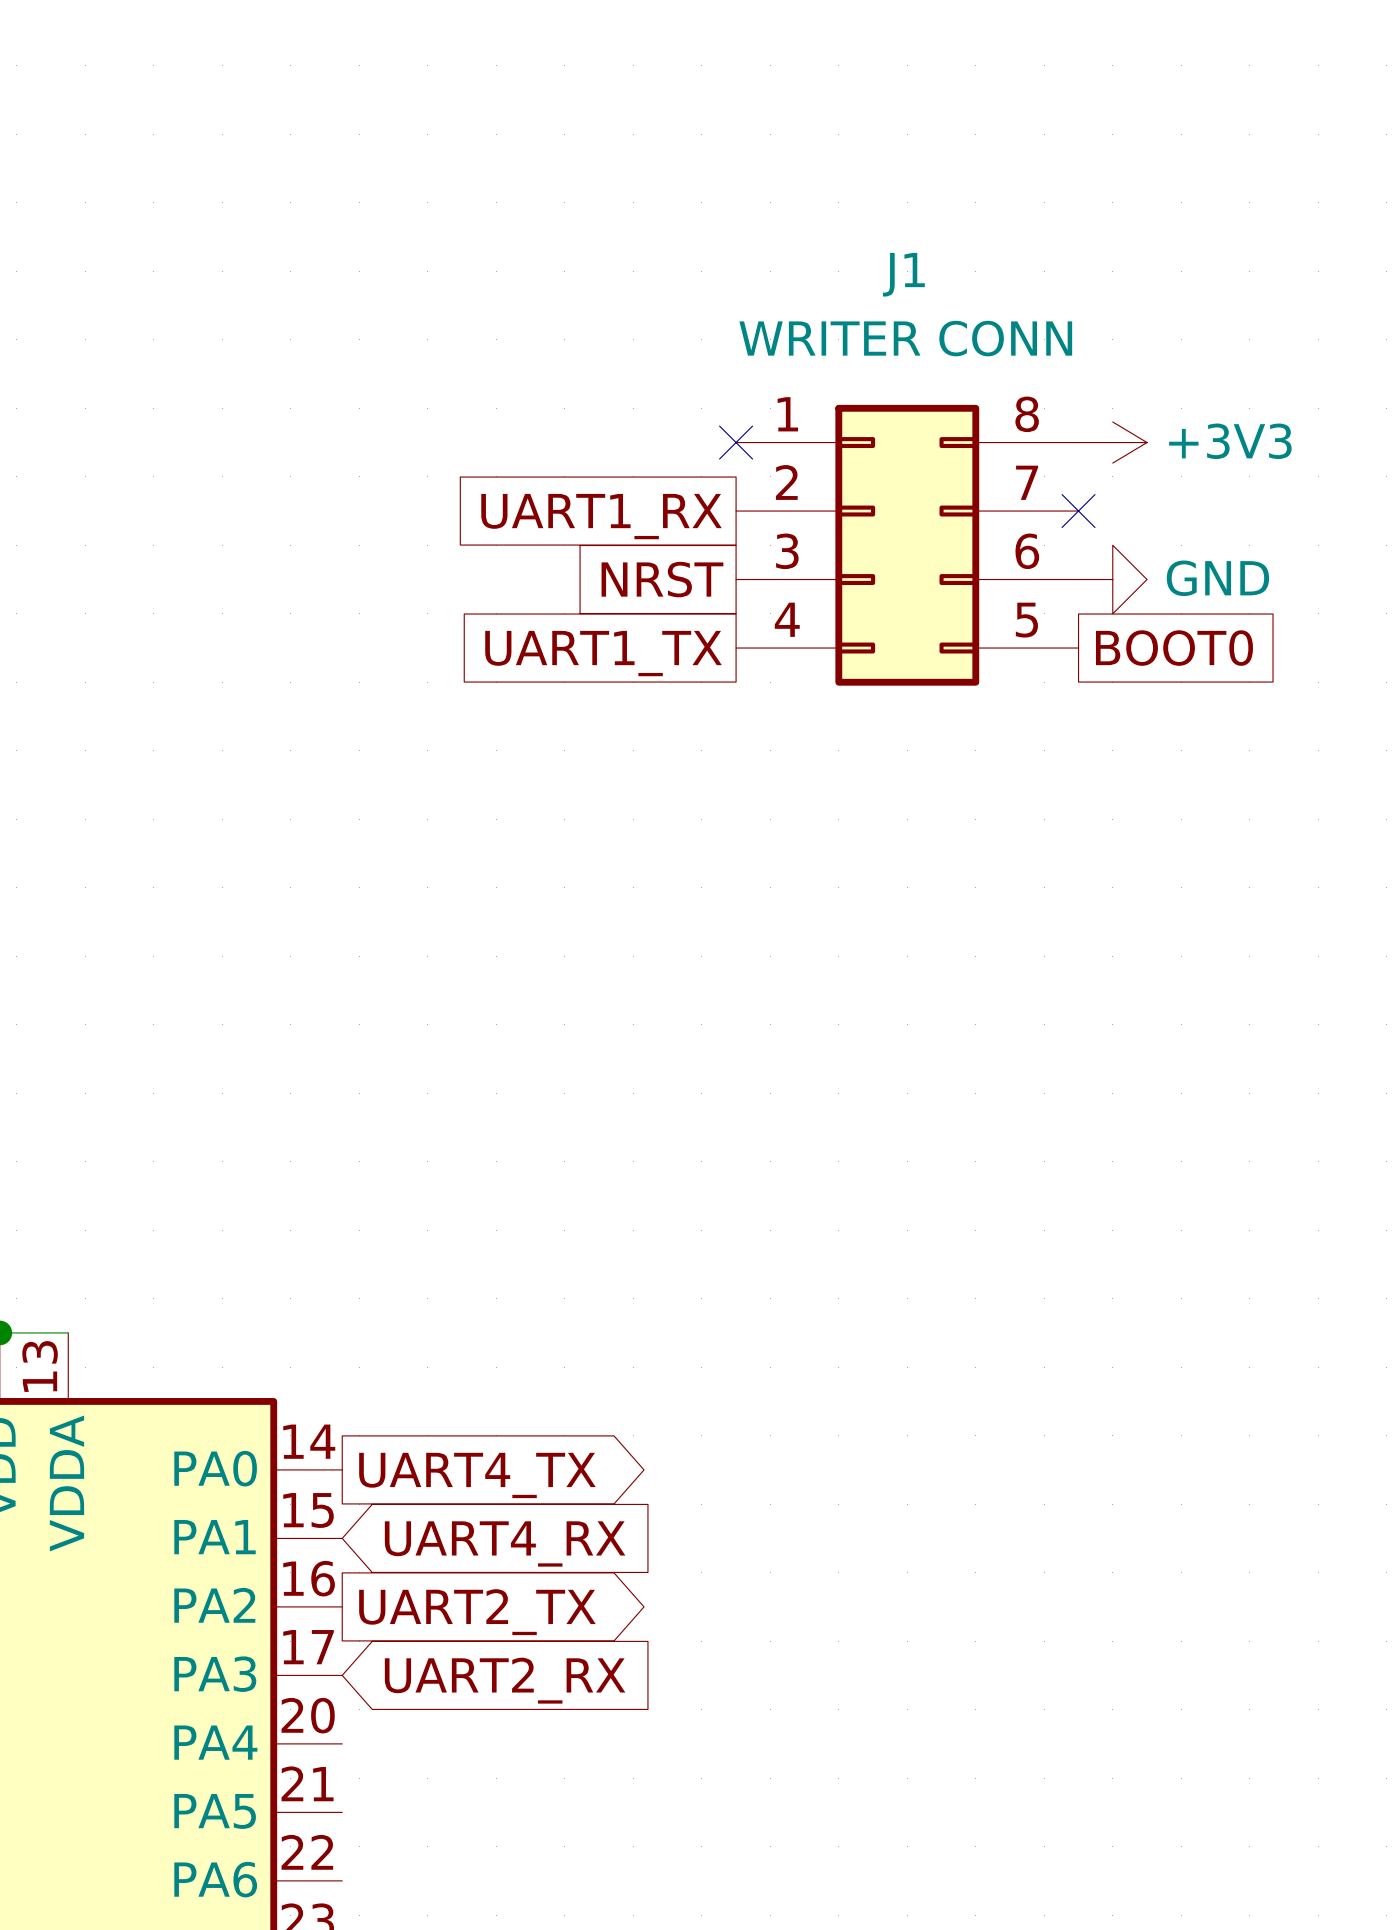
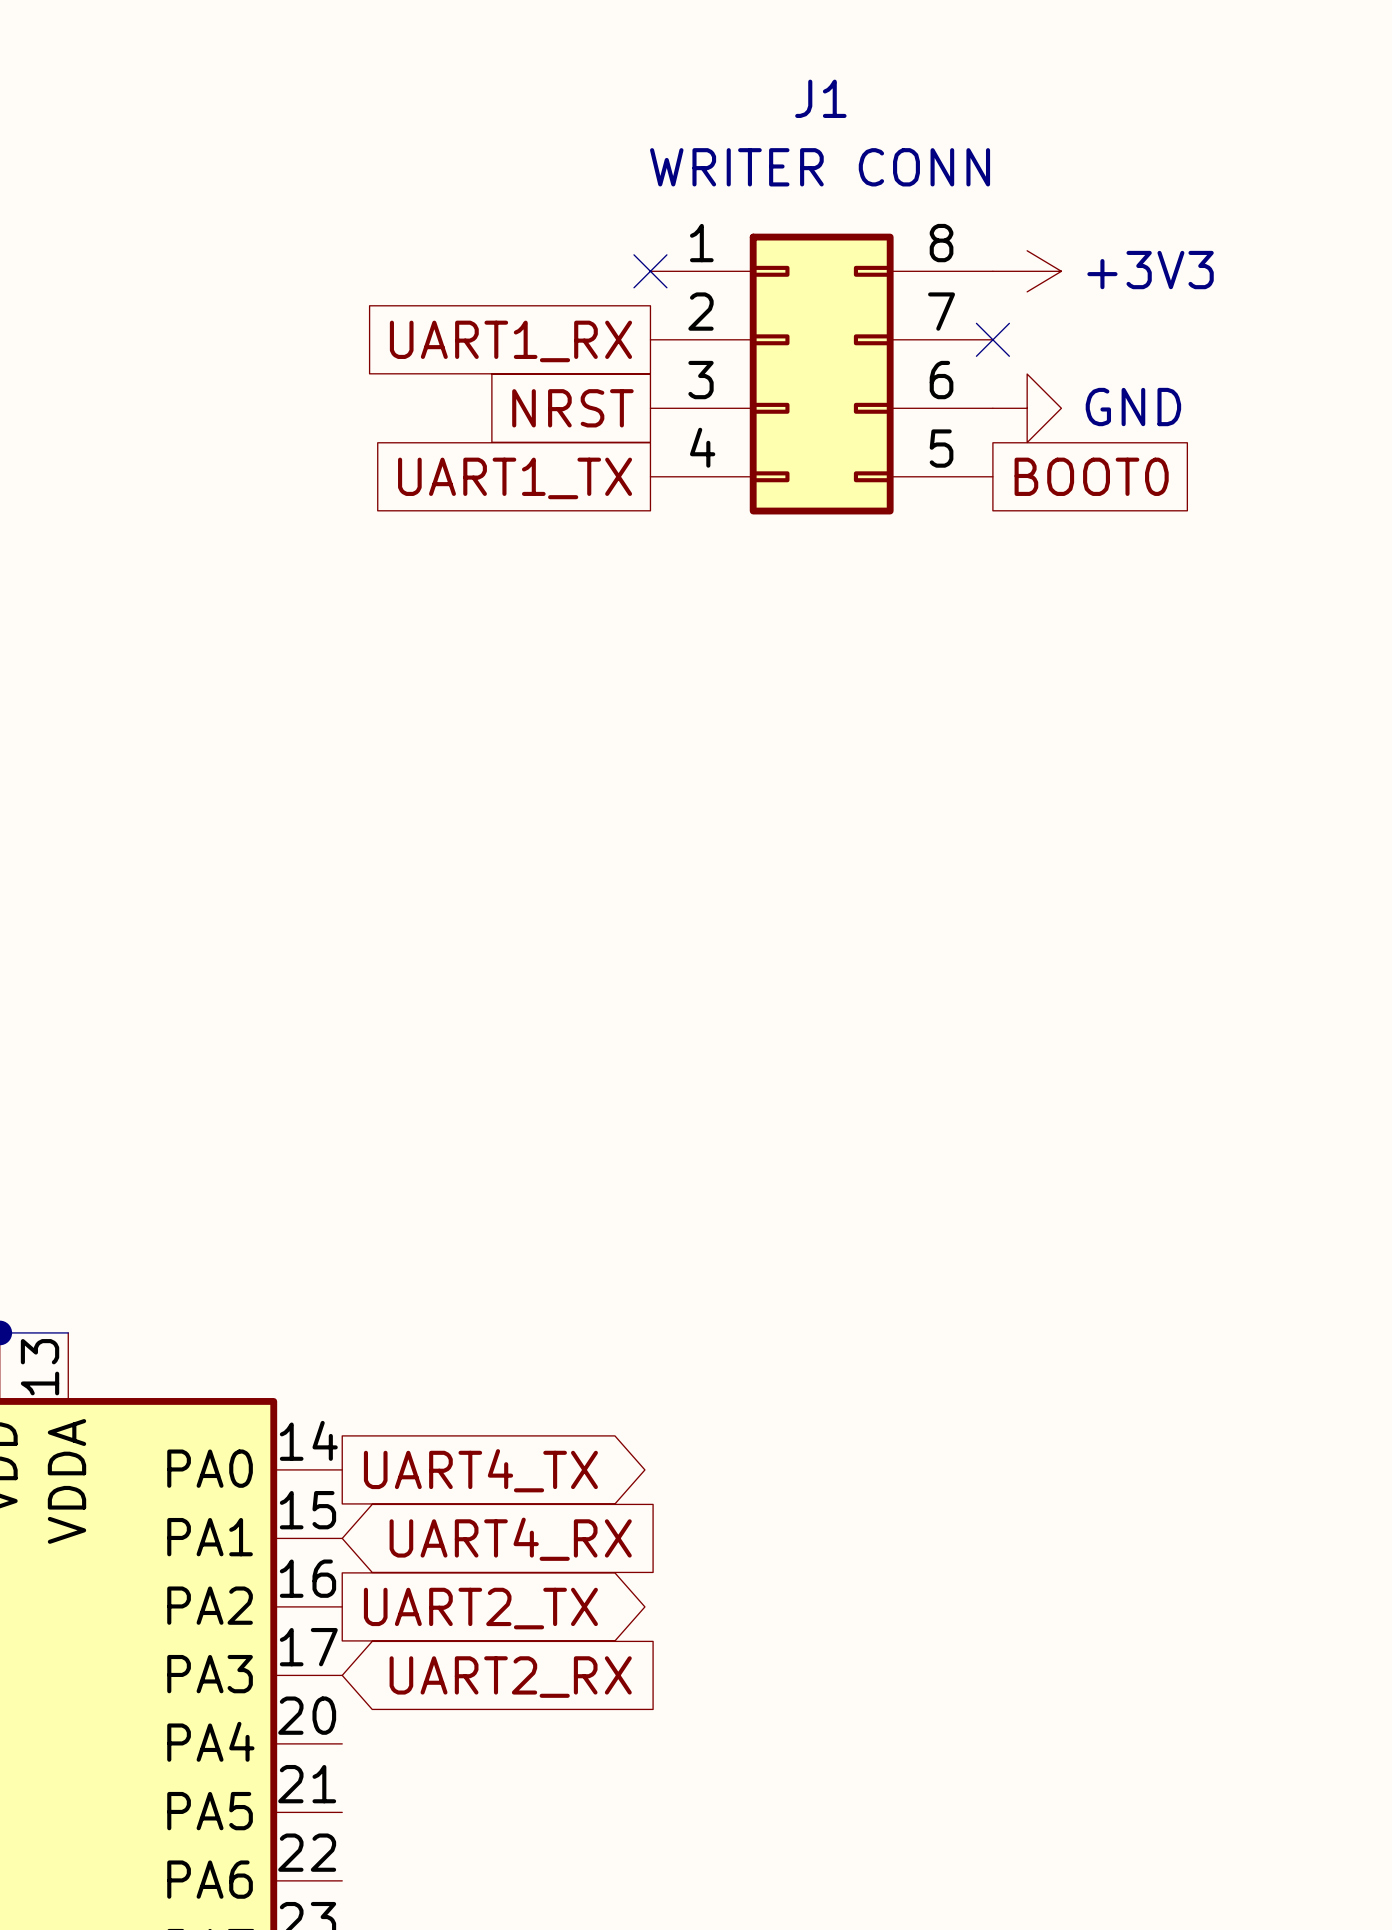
no-connect mark: none -> (650, 271)
no-connect mark: none -> (992, 339)
no-connect mark: (736, 442) -> none
power symbol position: +3V3 (1112, 442) -> +3V3 (1027, 271)
no-connect mark: (1078, 511) -> none
global label position: UART1_RX (601, 516) -> UART1_RX (510, 341)
J1 position: (907, 545) -> (821, 374)
global label position: NRST (662, 579) -> NRST (572, 408)
power symbol position: GND (1112, 579) -> GND (1027, 408)
global label position: BOOT0 (1174, 648) -> BOOT0 (1091, 476)
global label position: UART1_TX (603, 653) -> UART1_TX (515, 478)

